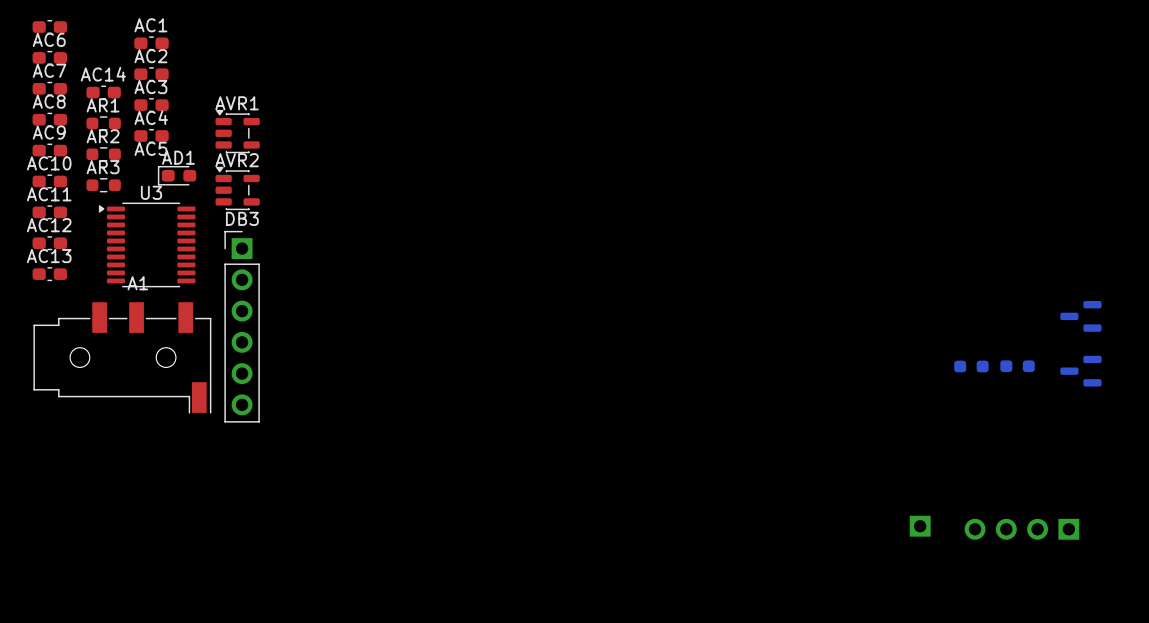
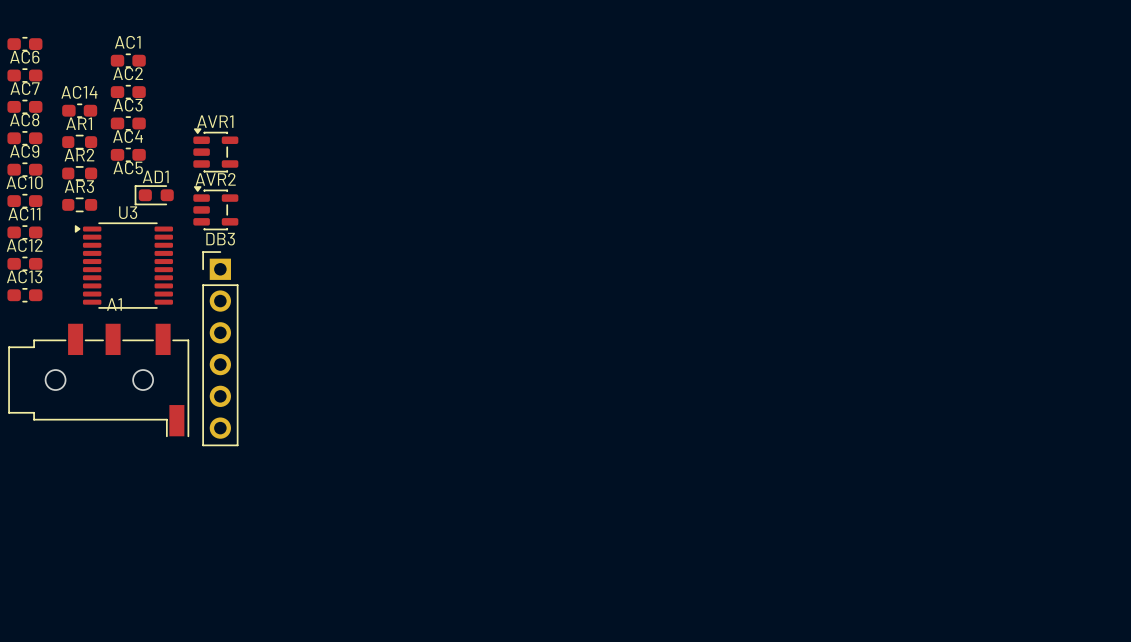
part: (1080, 316) -> none
part: (971, 366) -> none
part: (1017, 366) -> none
part: (1080, 371) -> none
part: (920, 526) -> none
part: (1021, 529) -> none

